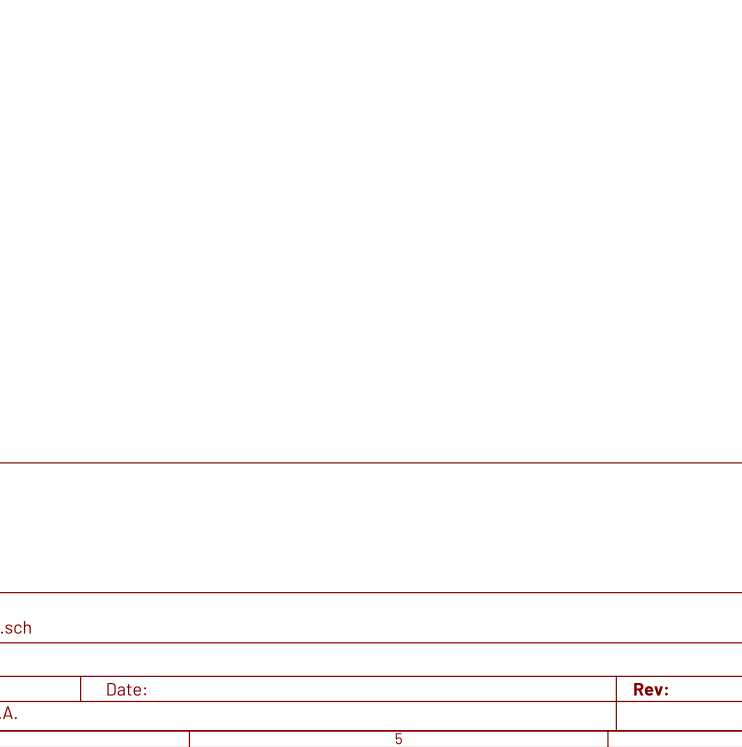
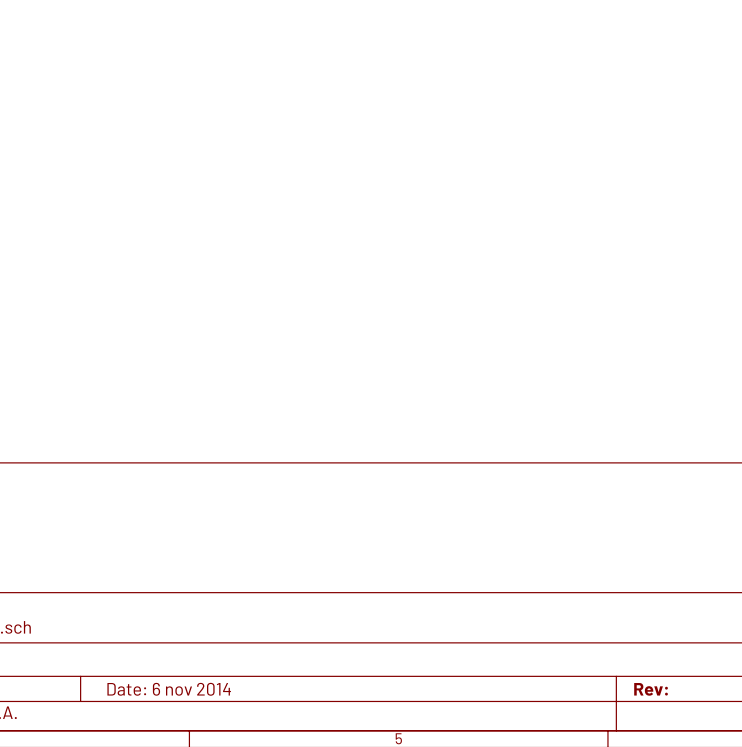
title block: Date: (126, 689) -> Date: 6 nov 2014 (169, 689)

